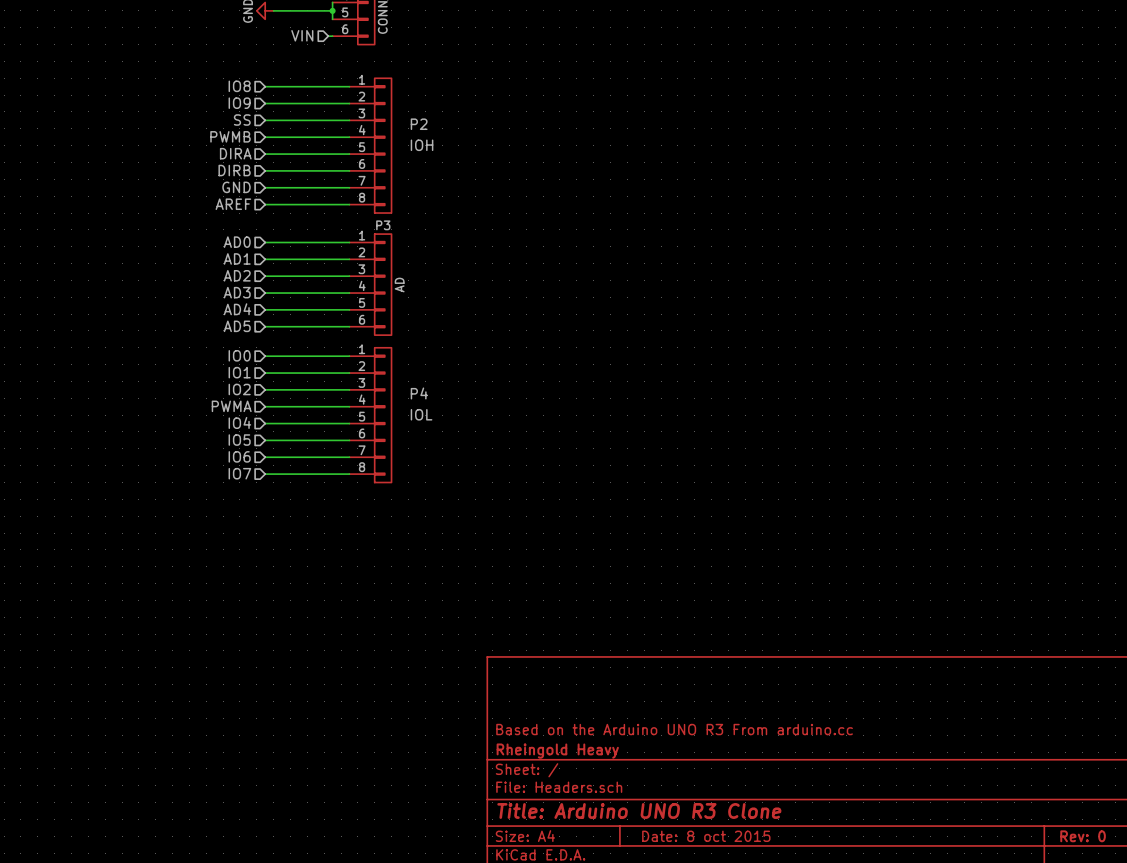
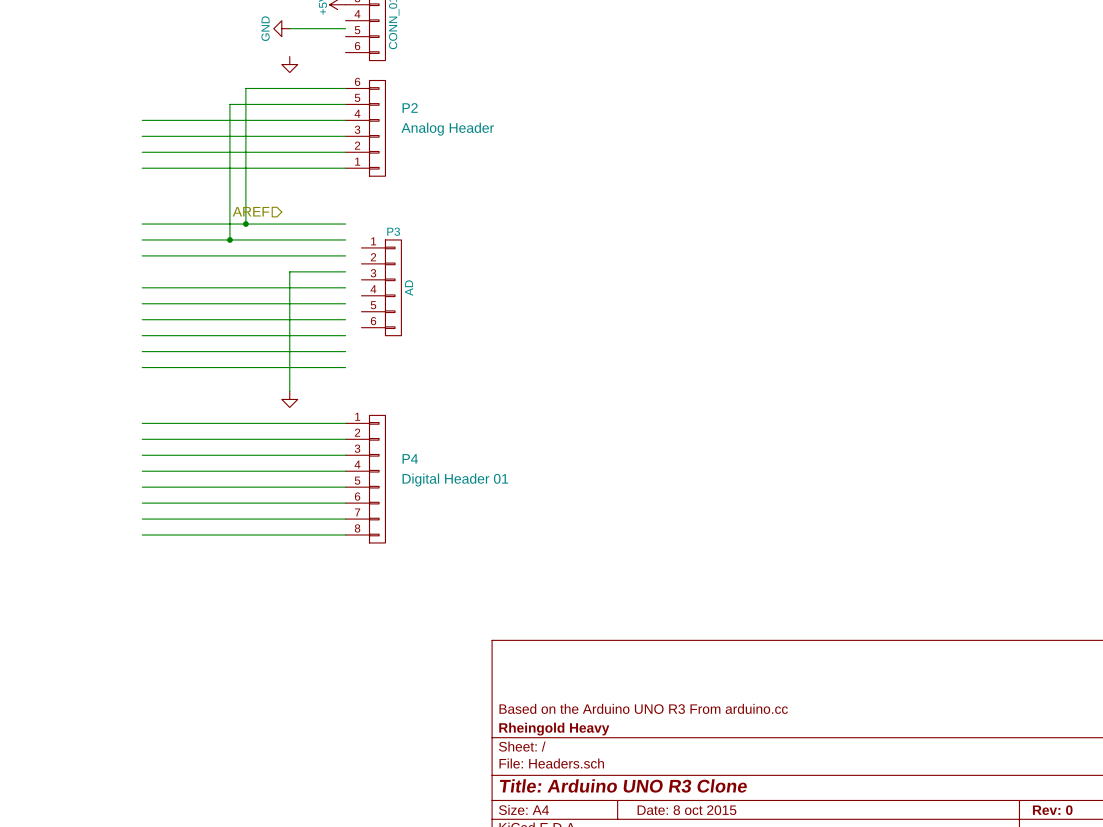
wire: (332, 2) (332, 19) -> none
junction: (332, 10) -> none
hierarchical label: VIN (302, 35) -> none
wire: (328, 36) (332, 36) -> none
power symbol: none -> (289, 64)
wire: none -> (345, 88) (245, 88) (245, 224)
P2 symbol: [349, 78, 392, 214] -> [345, 80, 386, 177]
hierarchical label: IO8 (239, 86) -> none
wire: (265, 86) (349, 86) -> none
wire: none -> (345, 104) (229, 104) (229, 239)
hierarchical label: IO9 (239, 103) -> none
wire: (265, 103) (349, 103) -> none
wire: none -> (142, 120) (345, 120)
hierarchical label: SS (242, 120) -> none
wire: (265, 120) (349, 120) -> none
wire: none -> (142, 136) (345, 136)
hierarchical label: PWMB (230, 136) -> none
wire: (265, 137) (349, 137) -> none
wire: none -> (142, 152) (345, 152)
P2 value: IOH (422, 145) -> Analog Header (447, 129)
hierarchical label: DIRA (235, 153) -> none
wire: (265, 154) (349, 154) -> none
wire: none -> (142, 168) (345, 168)
hierarchical label: DIRB (234, 170) -> none
wire: (265, 170) (349, 170) -> none
hierarchical label: GND (236, 187) -> none
wire: (265, 187) (349, 187) -> none
wire: (265, 204) (349, 204) -> none
wire: none -> (142, 224) (345, 224)
junction: none -> (245, 224)
wire: none -> (142, 239) (345, 239)
junction: none -> (229, 239)
hierarchical label: AD0 (237, 242) -> none
wire: (265, 242) (349, 242) -> none
wire: none -> (142, 255) (345, 255)
hierarchical label: AD1 (237, 258) -> none
wire: (265, 259) (349, 259) -> none
wire: none -> (345, 271) (289, 271) (289, 391)
hierarchical label: AD2 (237, 275) -> none
wire: (265, 276) (349, 276) -> none
wire: none -> (142, 287) (345, 287)
hierarchical label: AD3 (237, 292) -> none
wire: (265, 293) (349, 293) -> none
wire: none -> (142, 303) (345, 303)
hierarchical label: AD4 (237, 309) -> none
wire: (265, 309) (349, 309) -> none
wire: none -> (142, 319) (345, 319)
hierarchical label: AD5 (237, 326) -> none
wire: (265, 326) (349, 326) -> none
wire: none -> (142, 335) (345, 335)
wire: none -> (142, 351) (345, 351)
hierarchical label: IO0 (239, 355) -> none
wire: (265, 356) (349, 356) -> none
wire: none -> (142, 367) (345, 367)
hierarchical label: IO1 (239, 372) -> none
wire: (265, 373) (349, 373) -> none
hierarchical label: IO2 (239, 389) -> none
wire: (265, 389) (349, 389) -> none
power symbol: none -> (289, 399)
hierarchical label: PWMA (231, 406) -> none
wire: (265, 406) (349, 406) -> none
P4 value: IOL (421, 414) -> Digital Header 01 (455, 480)
P4 position: (370, 415) -> (365, 479)
hierarchical label: IO4 (239, 422) -> none
wire: (265, 423) (349, 423) -> none
wire: none -> (142, 423) (345, 423)
hierarchical label: IO5 (239, 440) -> none
wire: (265, 440) (349, 440) -> none
wire: none -> (142, 439) (345, 439)
hierarchical label: IO6 (239, 456) -> none
wire: (265, 457) (349, 457) -> none
wire: none -> (142, 455) (345, 455)
hierarchical label: IO7 (239, 473) -> none
wire: (265, 474) (349, 474) -> none
wire: none -> (142, 471) (345, 471)
wire: none -> (142, 487) (345, 487)
wire: none -> (142, 503) (345, 503)
wire: none -> (142, 519) (345, 519)
wire: none -> (142, 535) (345, 535)

